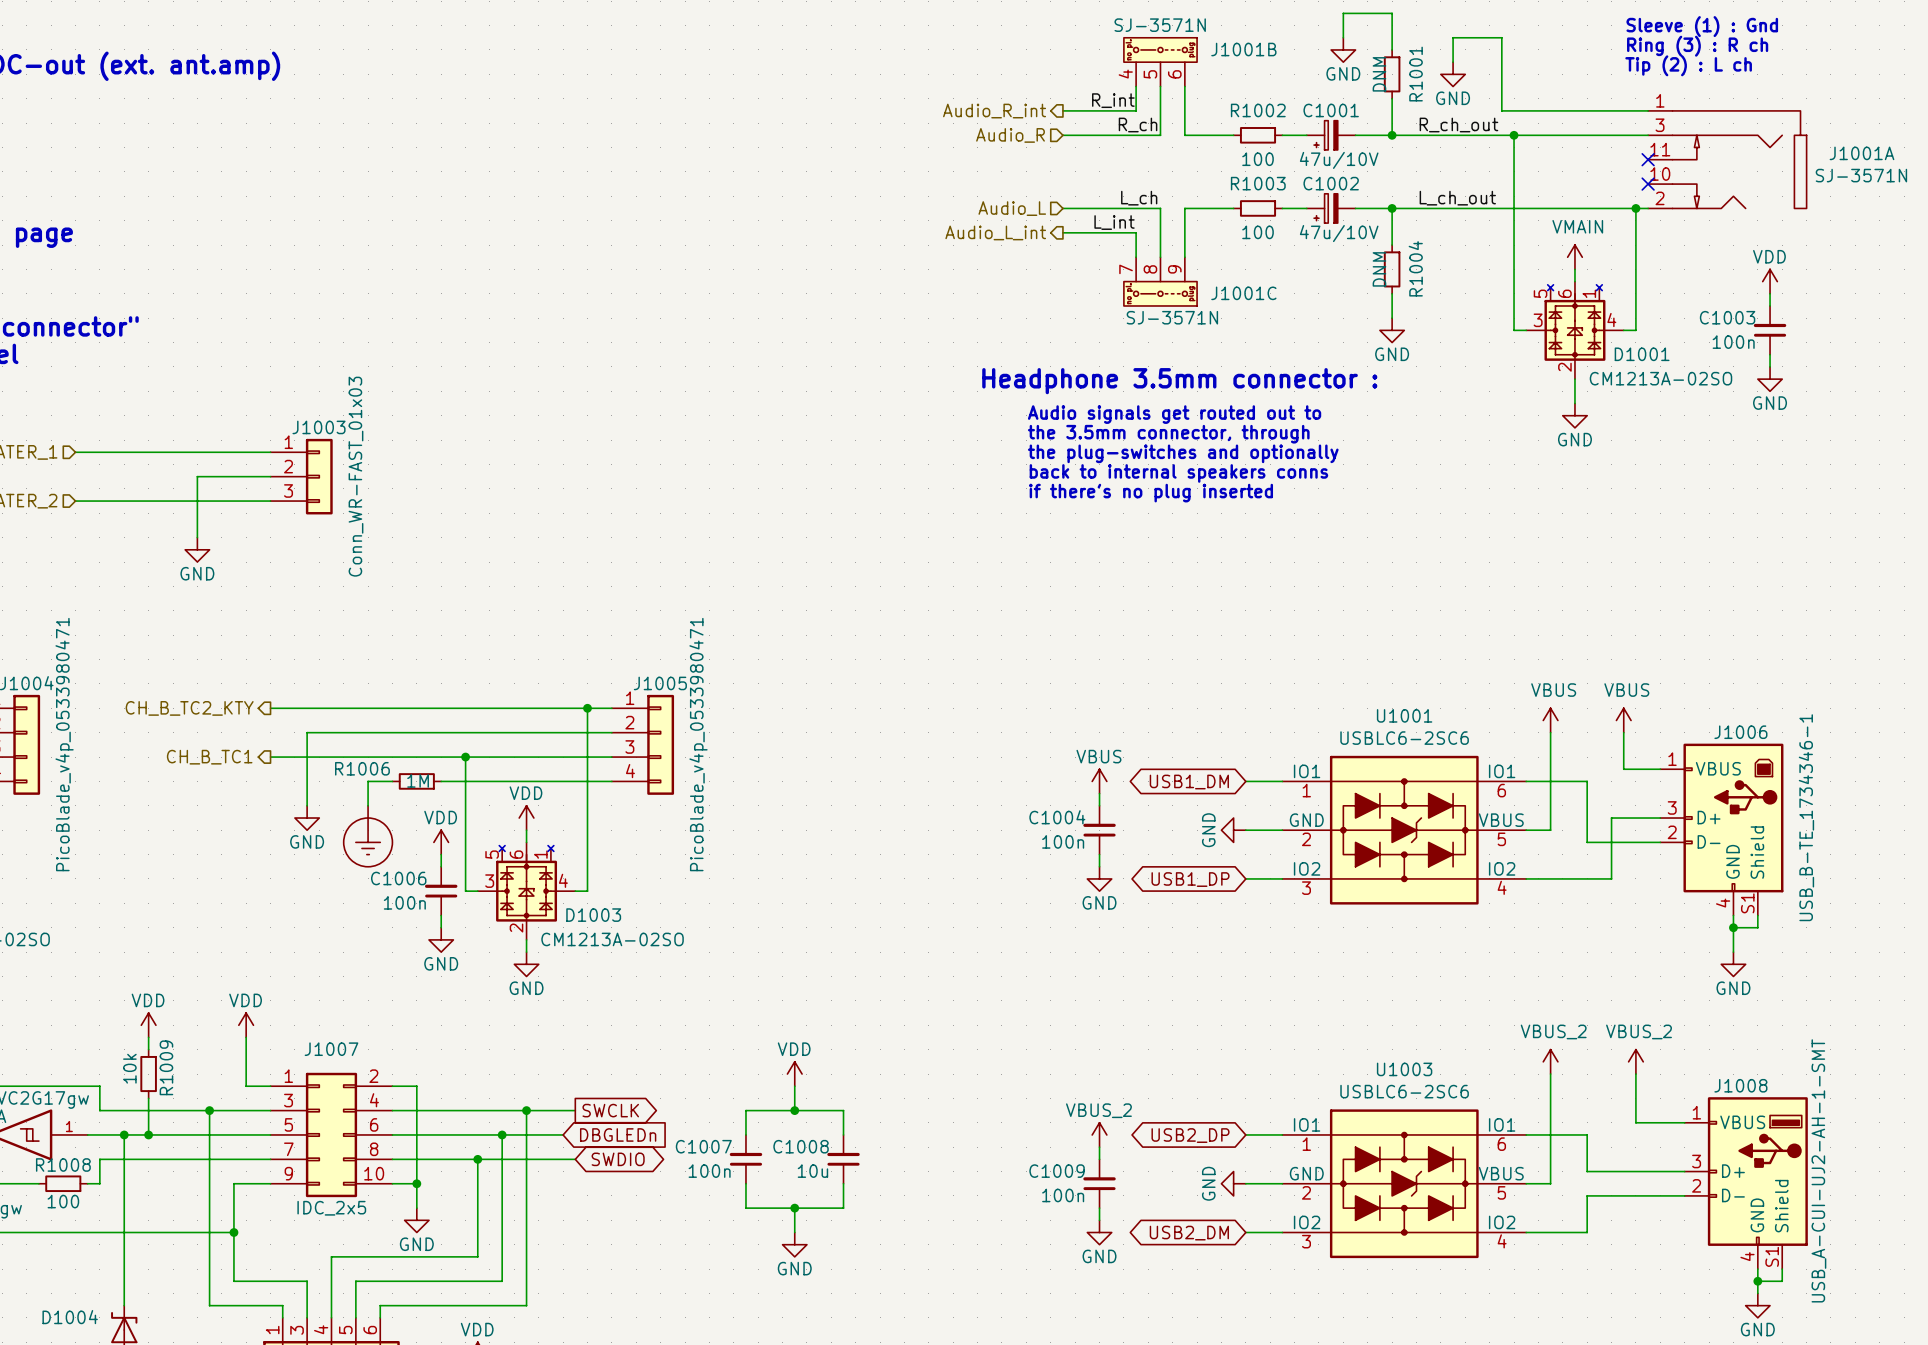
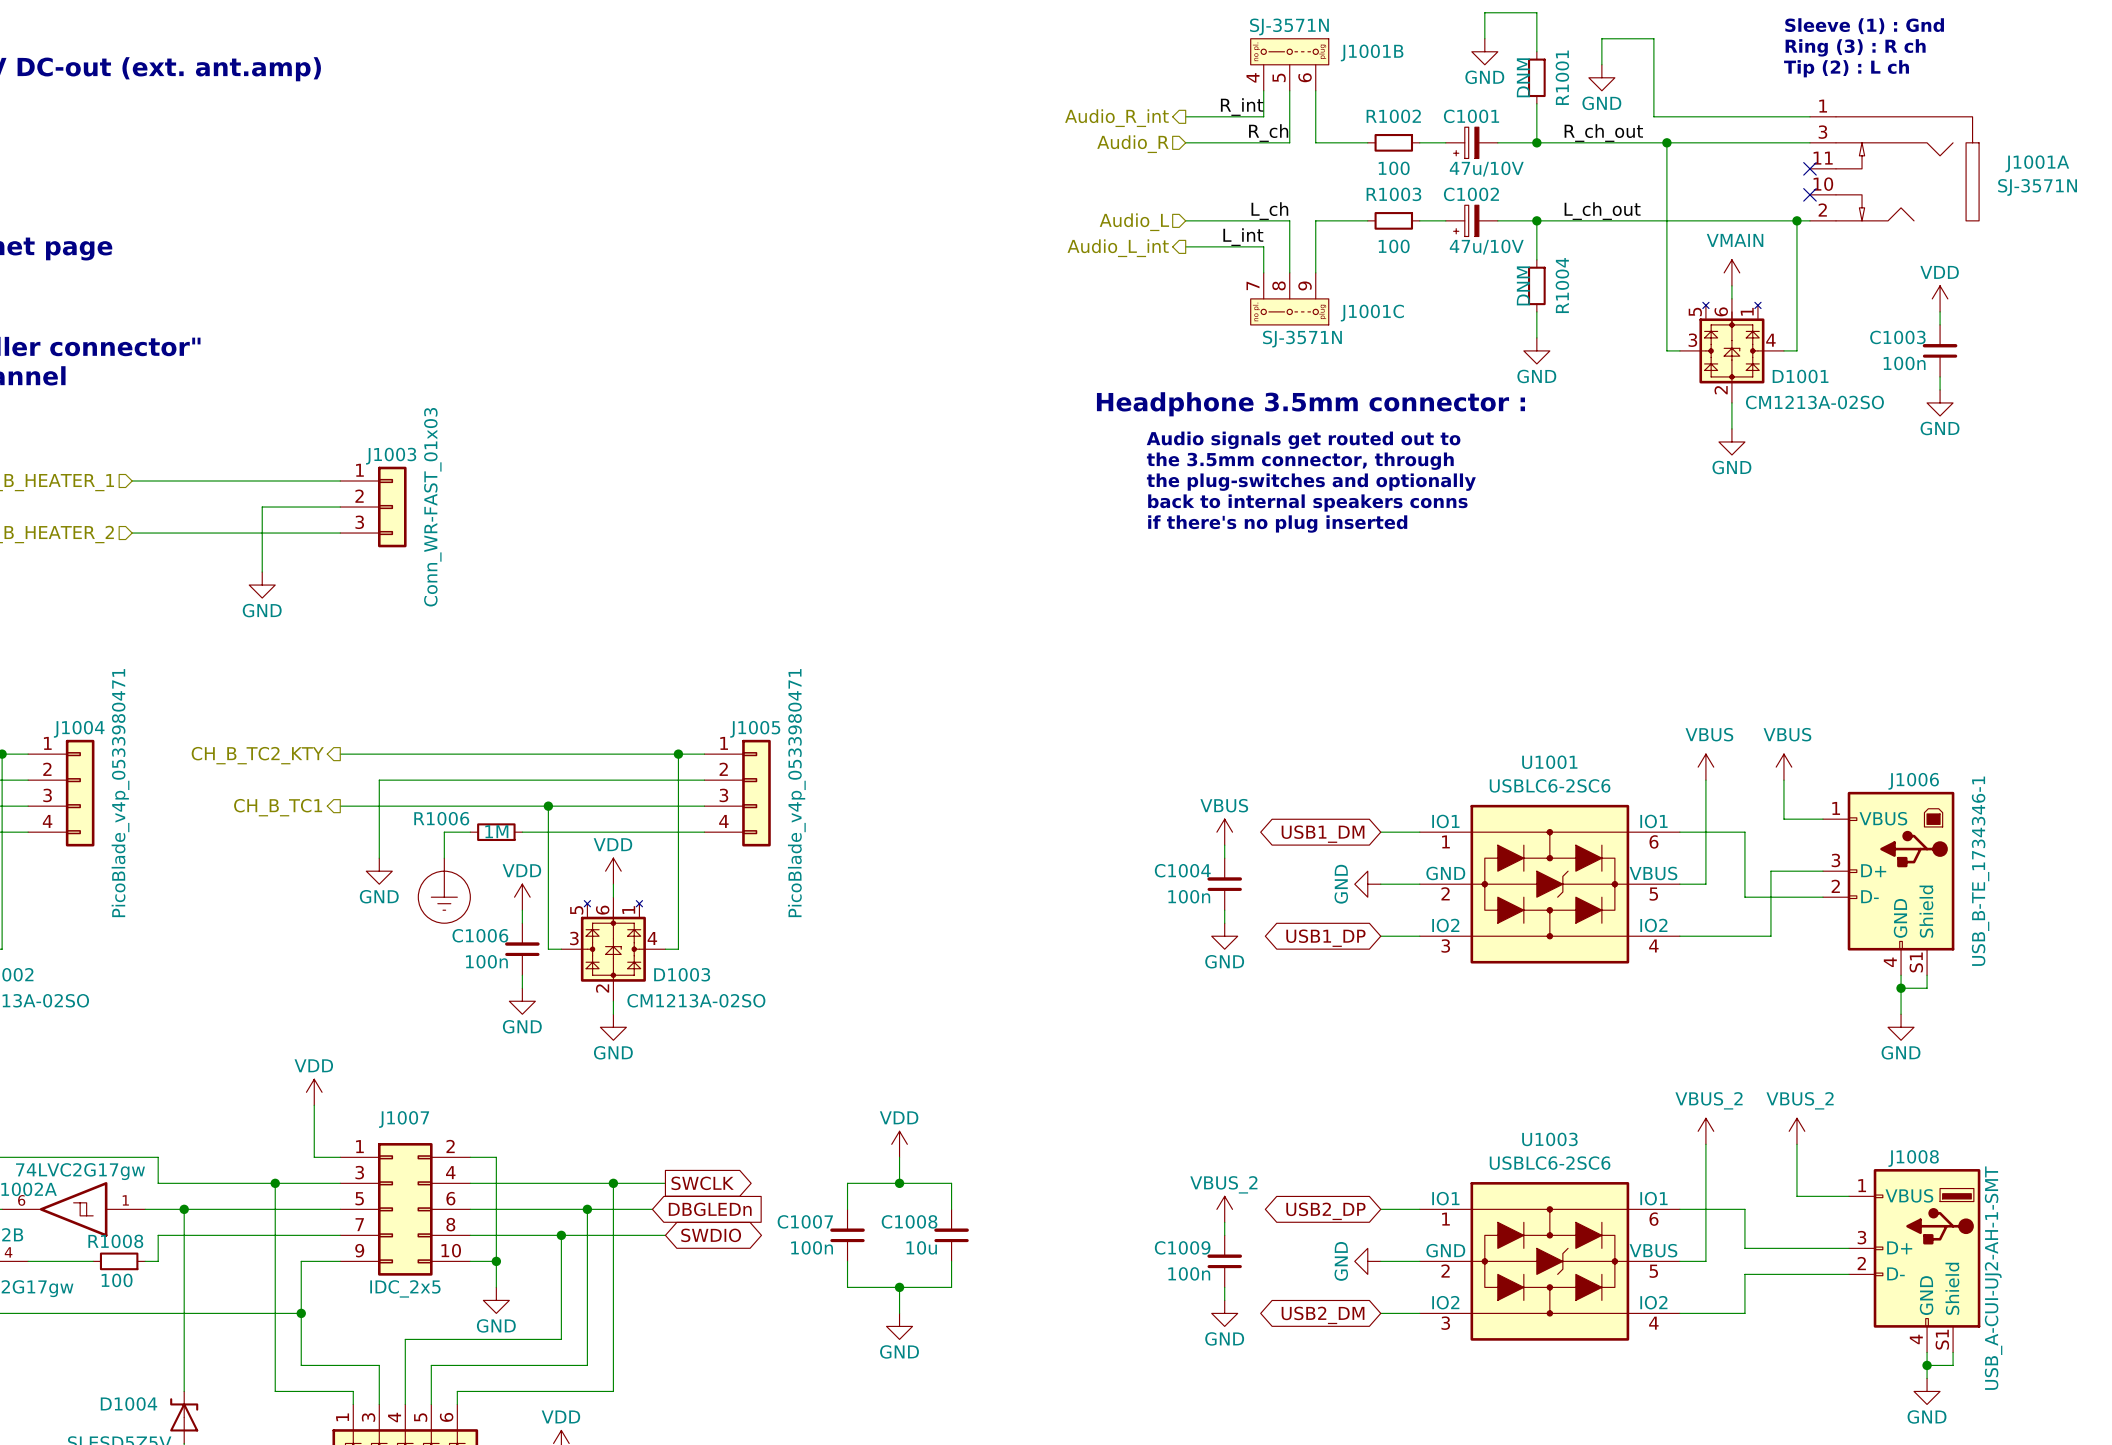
power symbol: VDD (148, 1025) -> none
wire: (148, 1037) (148, 1049) -> none
R1009: 10k (148, 1074) -> none
wire: (148, 1098) (148, 1134) -> none
junction: (148, 1134) -> none

